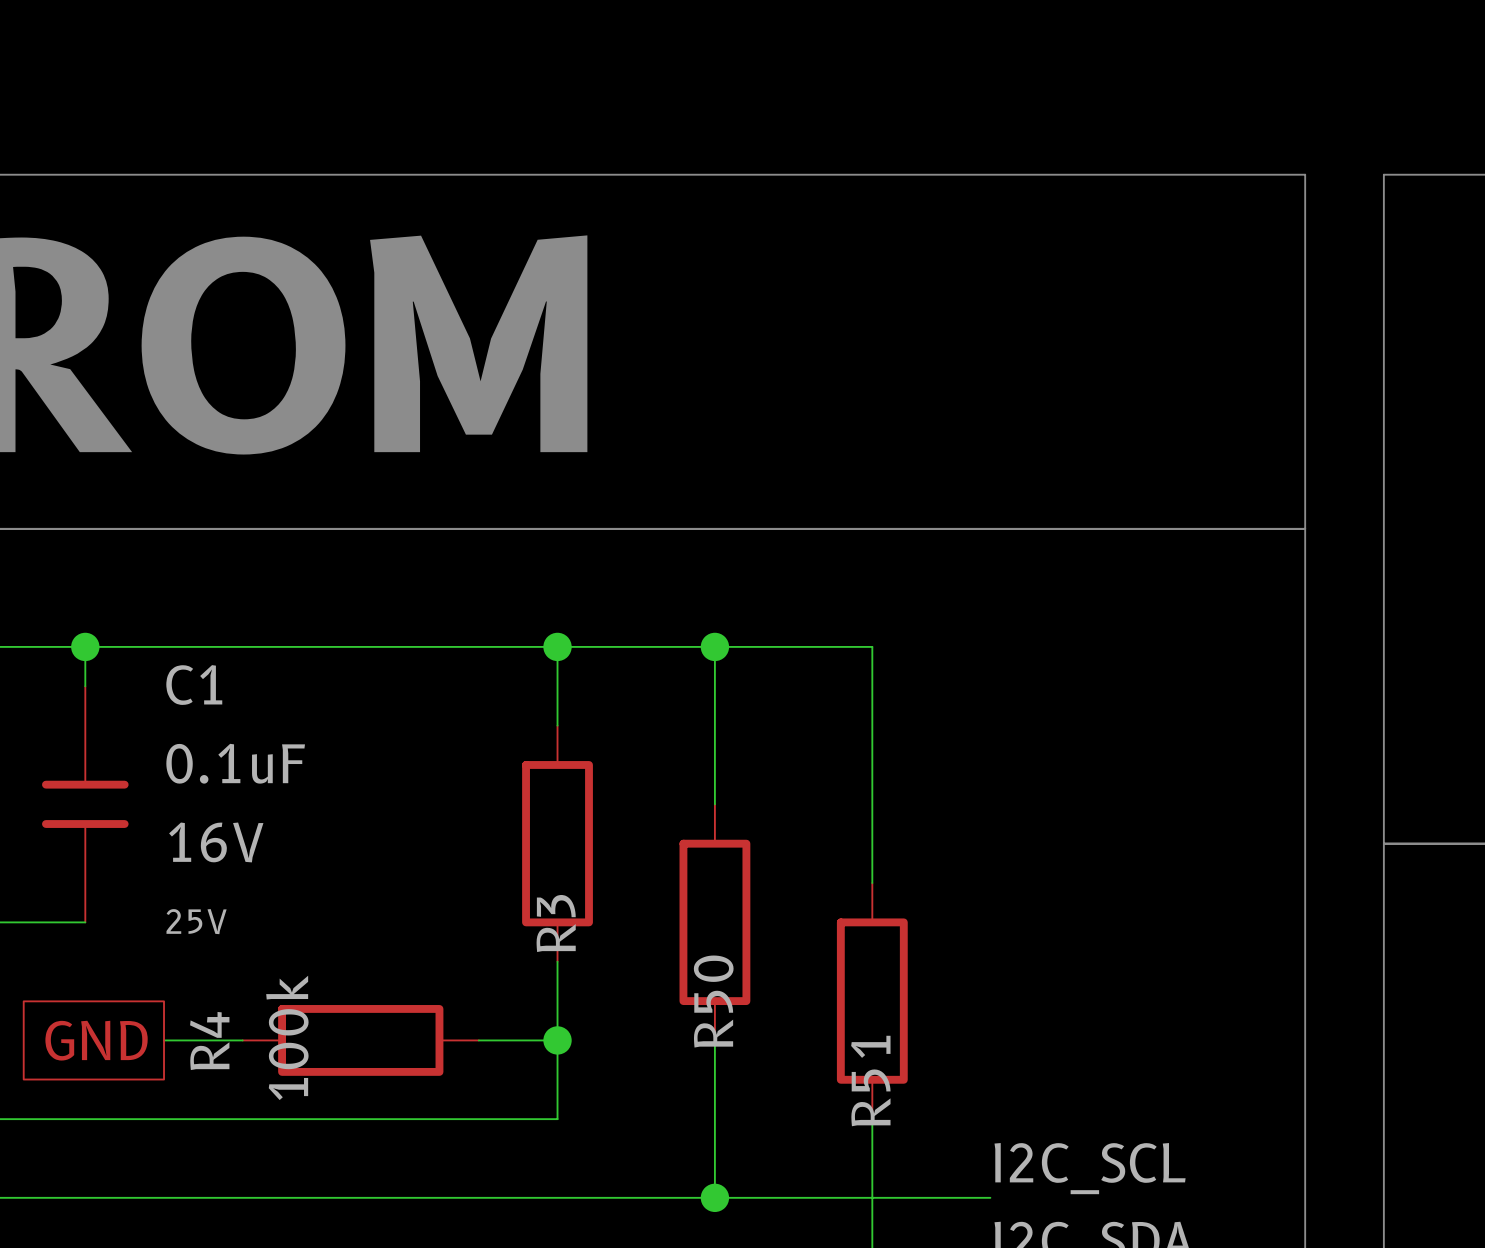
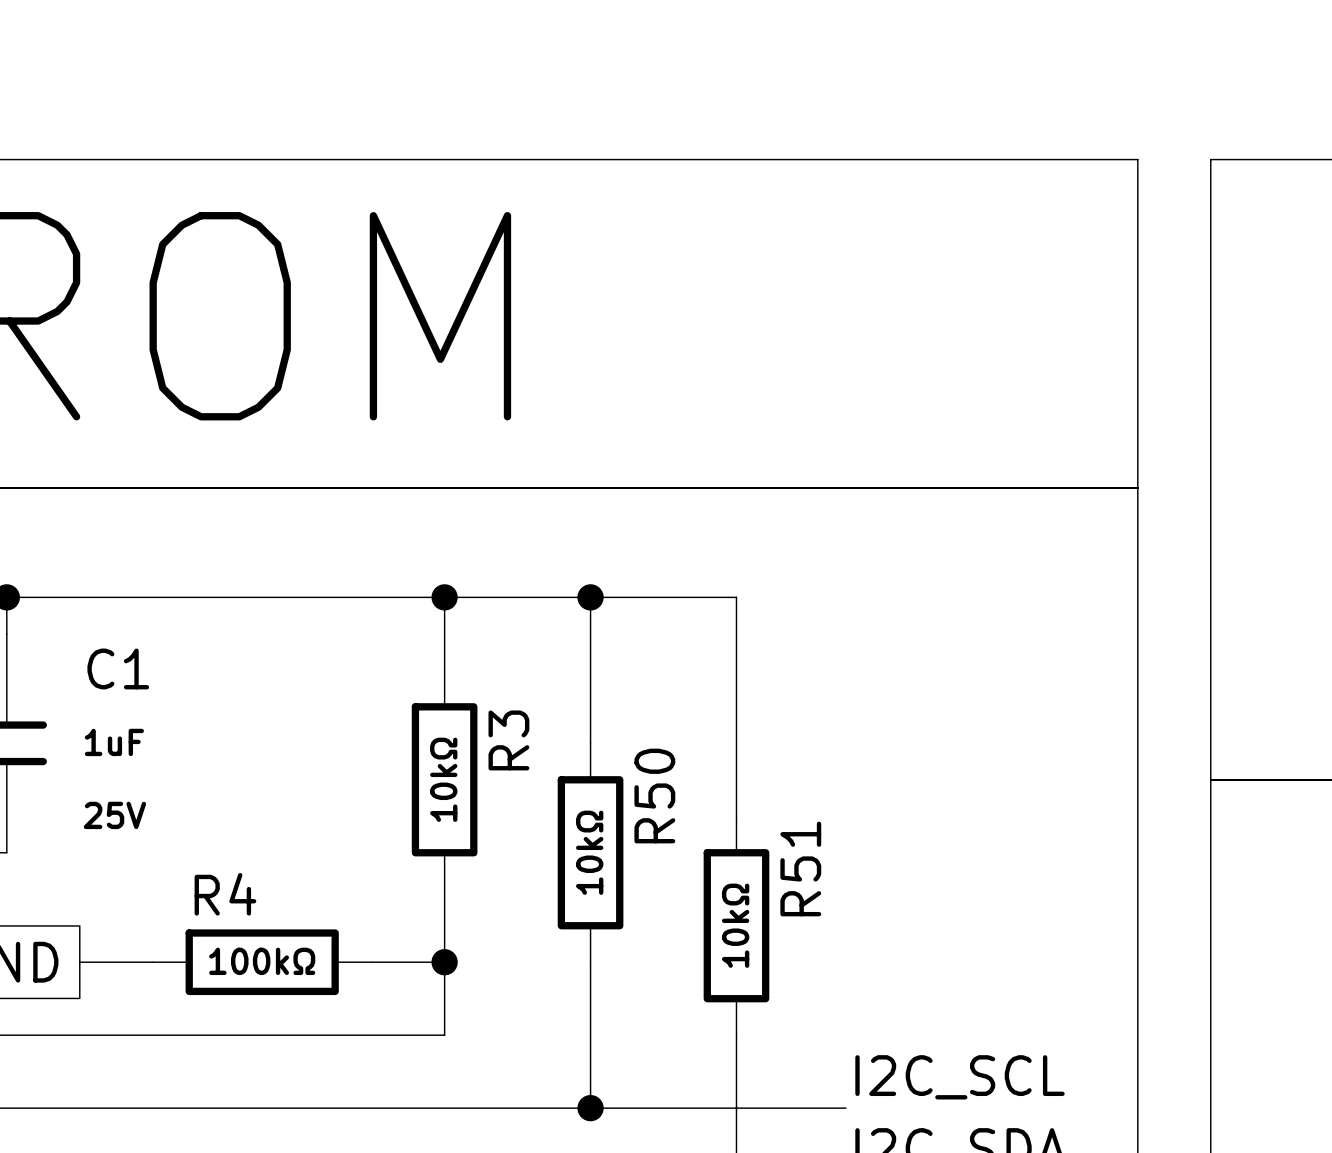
C1 name position: C1 (194, 685) -> C1 (118, 668)
C1 value: 0.1uF (235, 763) -> 1uF (114, 742)
C1 text: 16V (216, 842) -> none
R3 value: none -> 10kΩ (443, 779)
C1 text position: 25V (196, 921) -> 25V (114, 815)
R50 value: none -> 10kΩ (589, 852)
R3 name position: R3 (556, 923) -> R3 (508, 740)
R51 value: none -> 10kΩ (735, 925)
R50 name position: R50 (713, 1001) -> R50 (654, 796)
R4 value: 100k (287, 1037) -> 100kΩ (262, 961)
R4 name rotation: 0° (209, 1041) -> 90° clockwise (225, 894)
R4 name position: R4 (209, 1041) -> R4 (225, 894)
R51 name position: R51 (870, 1081) -> R51 (800, 868)

